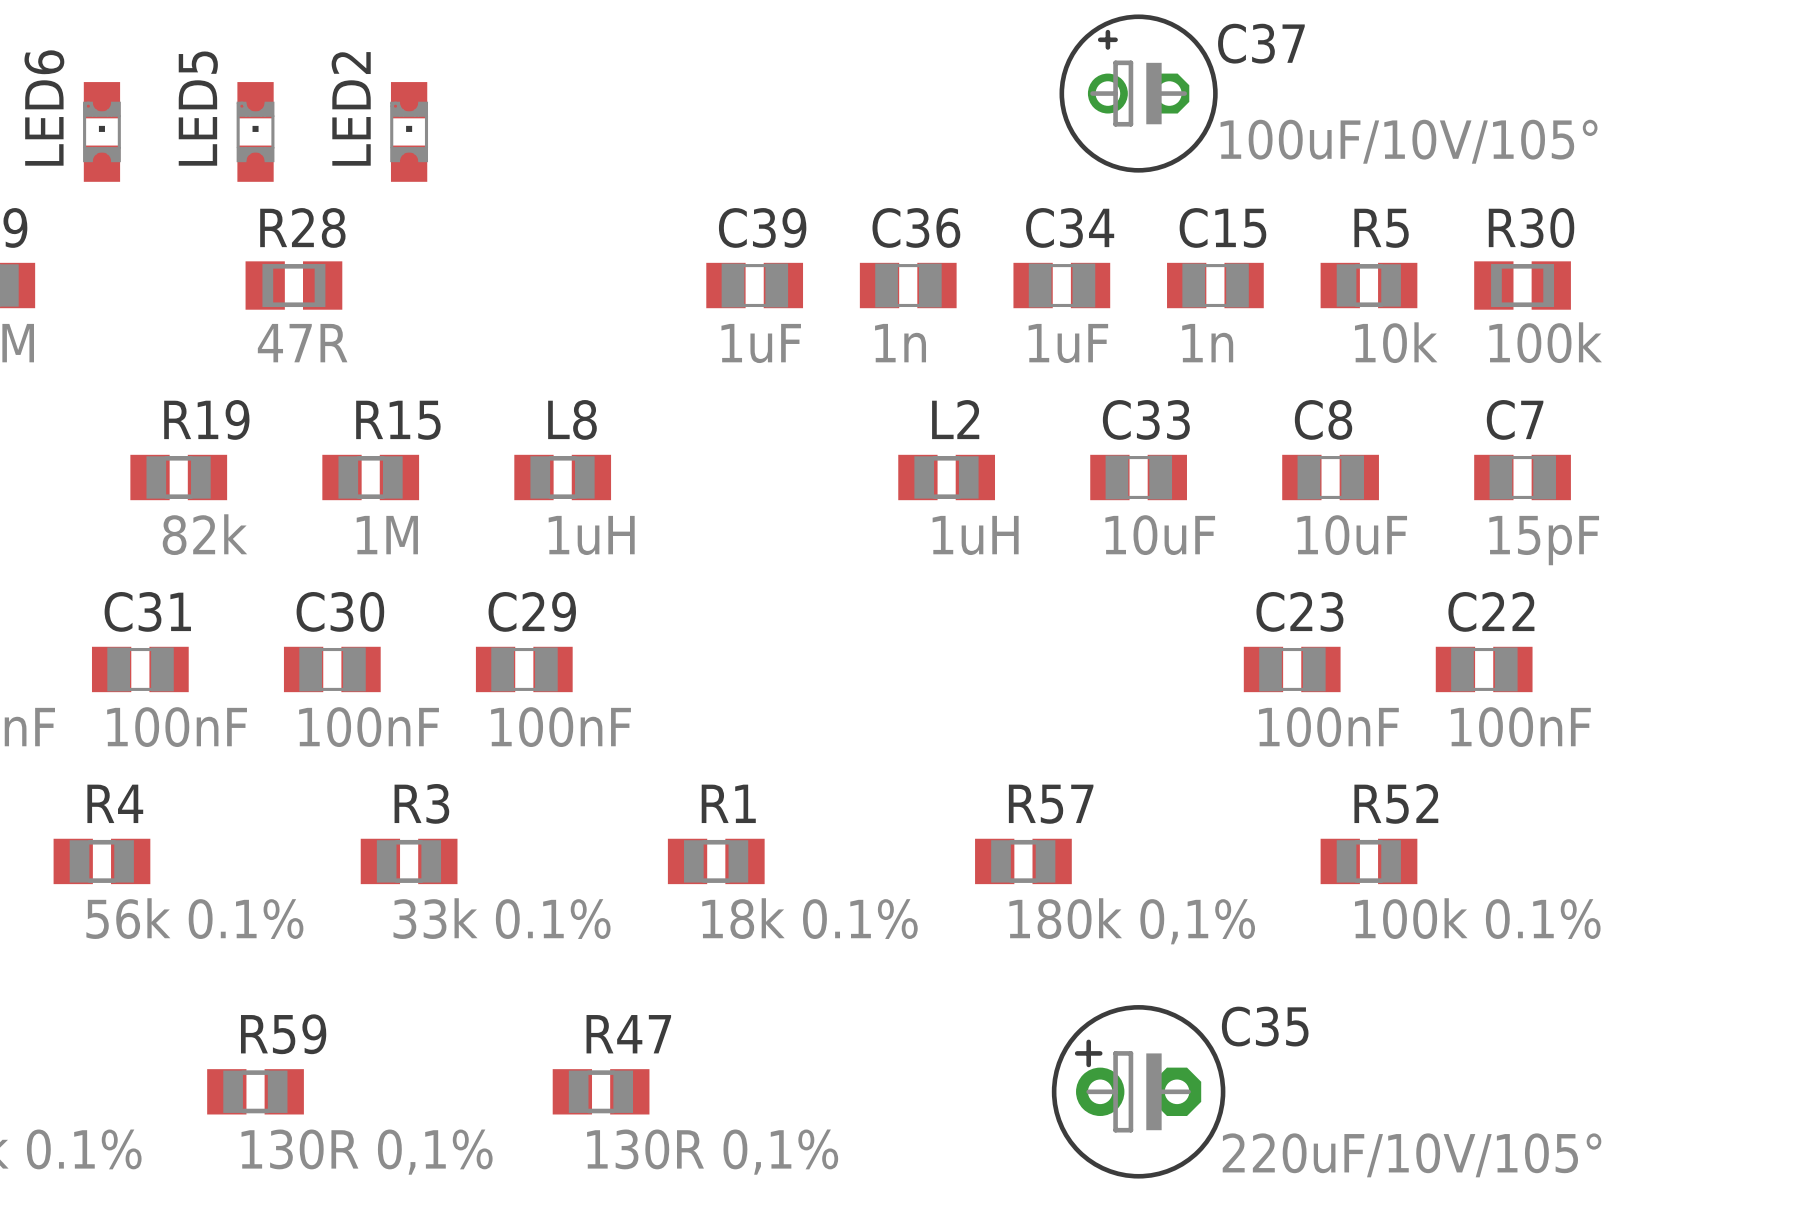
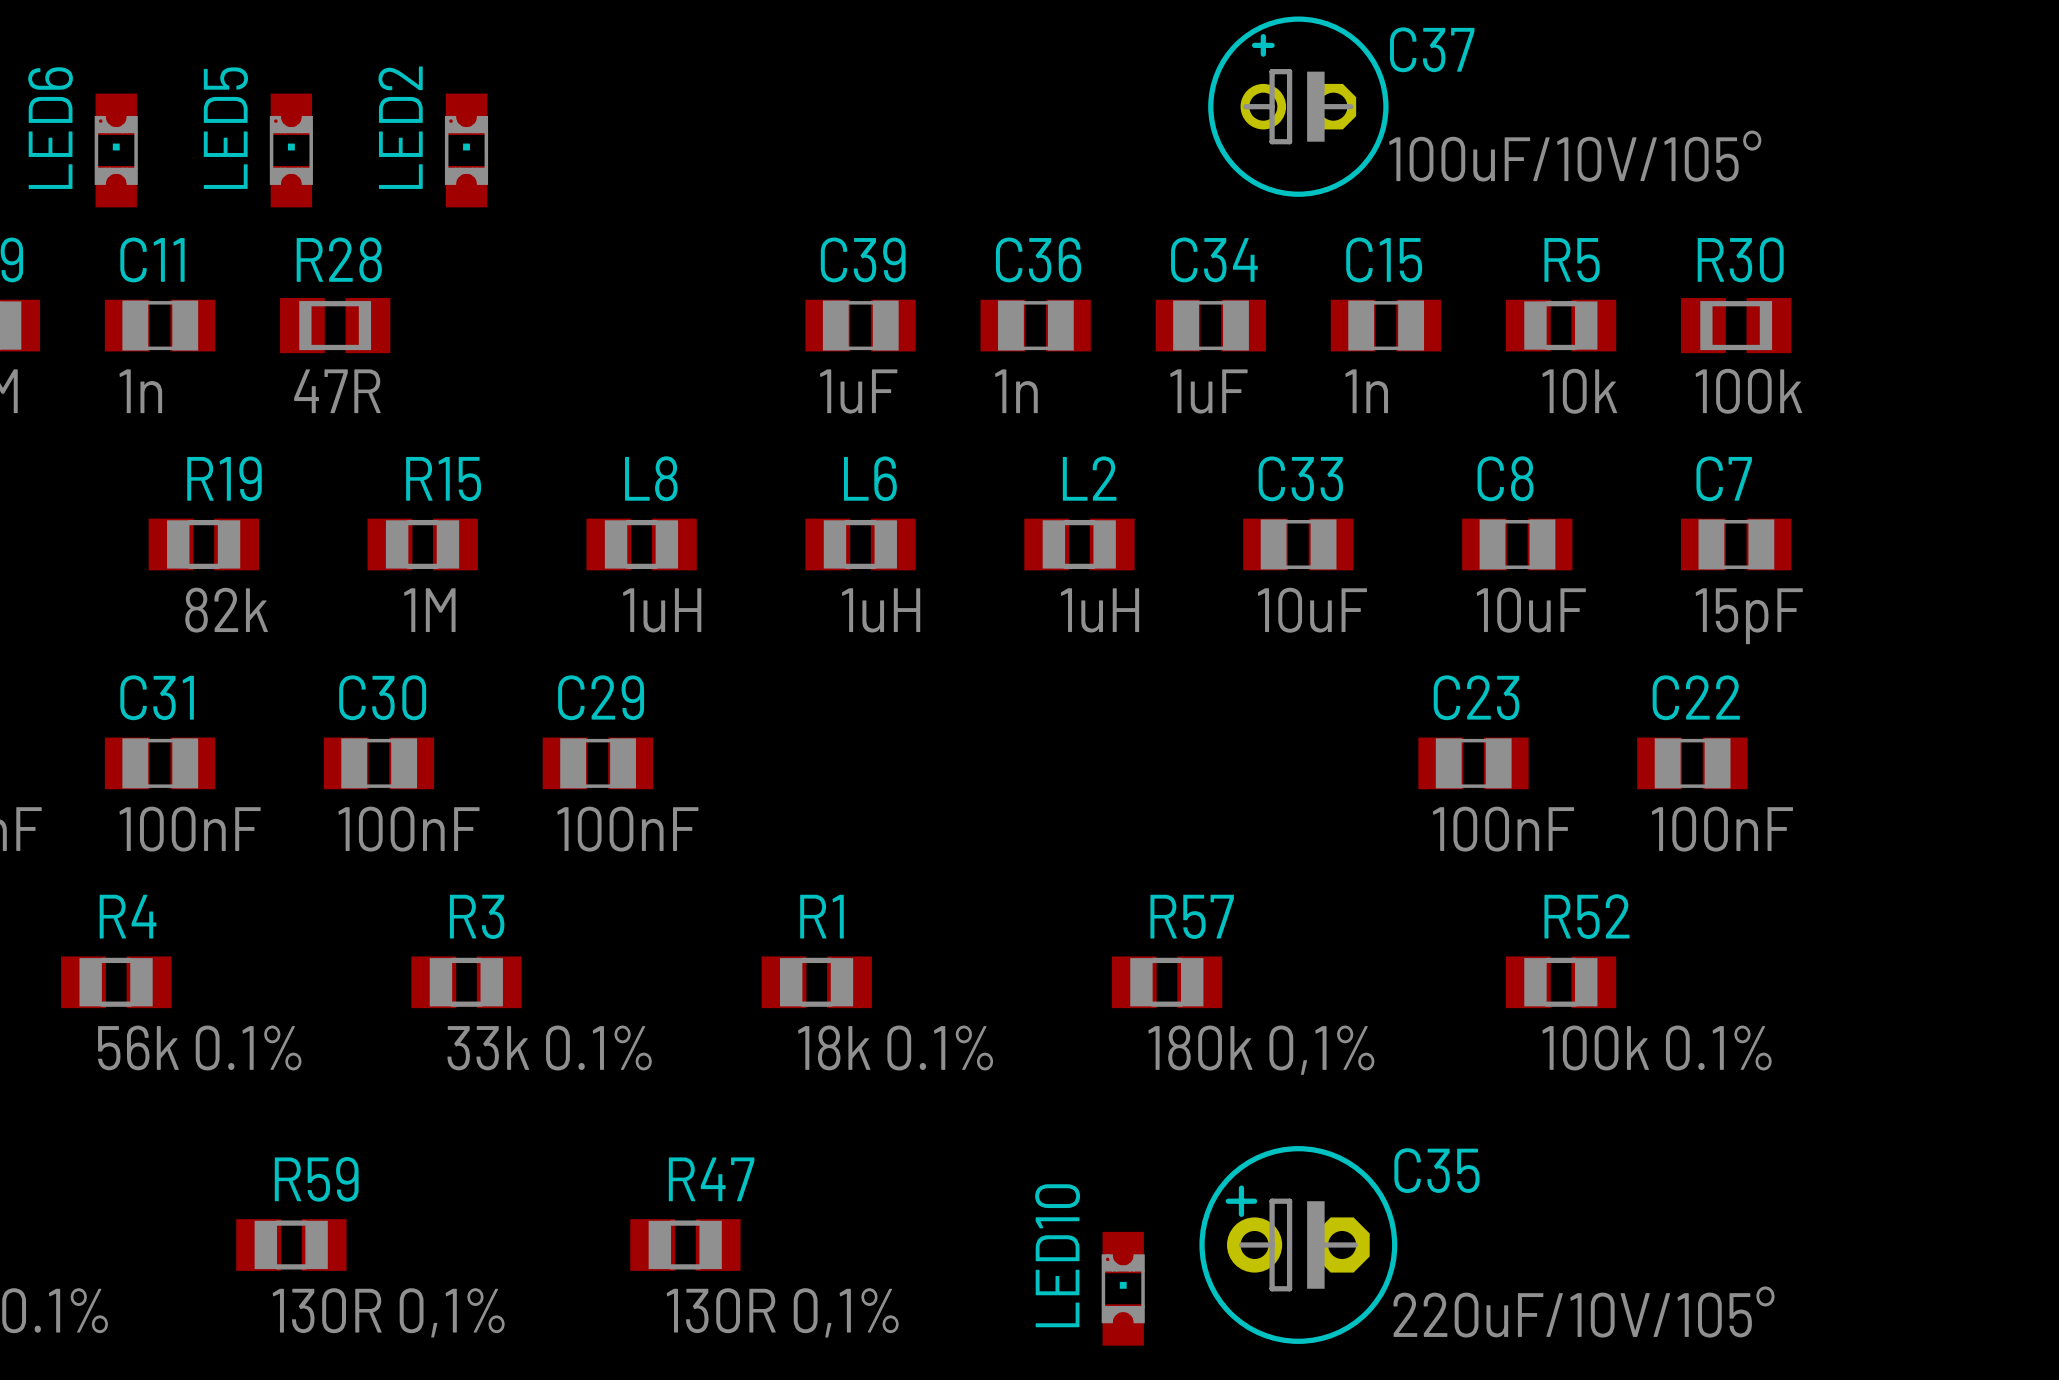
C11: none -> 1n (160, 325)
L6: none -> 1uH (860, 544)
LED10: none -> (1123, 1288)

